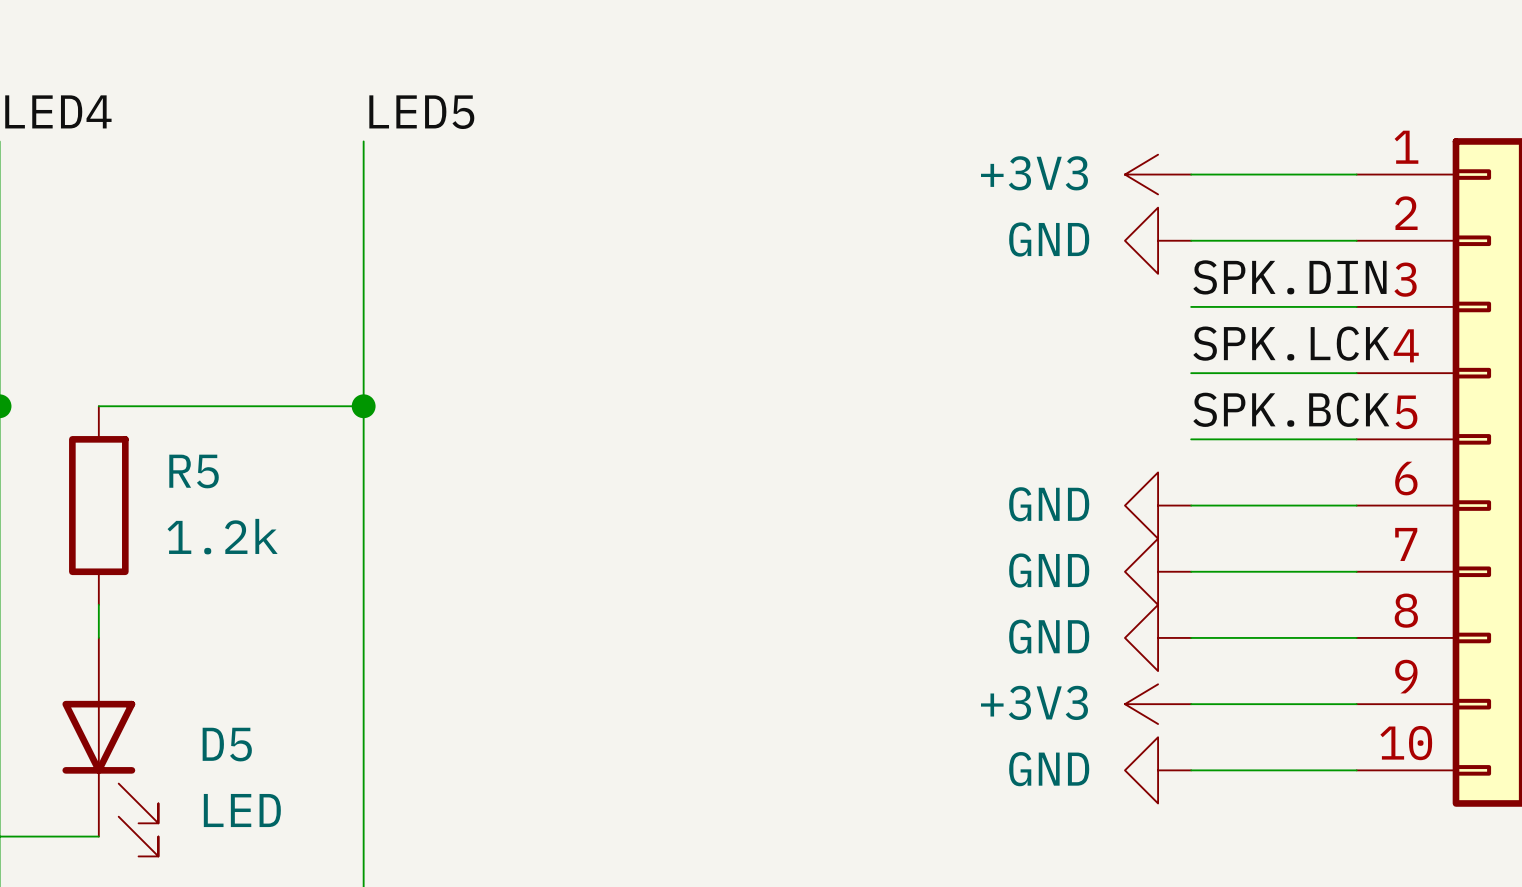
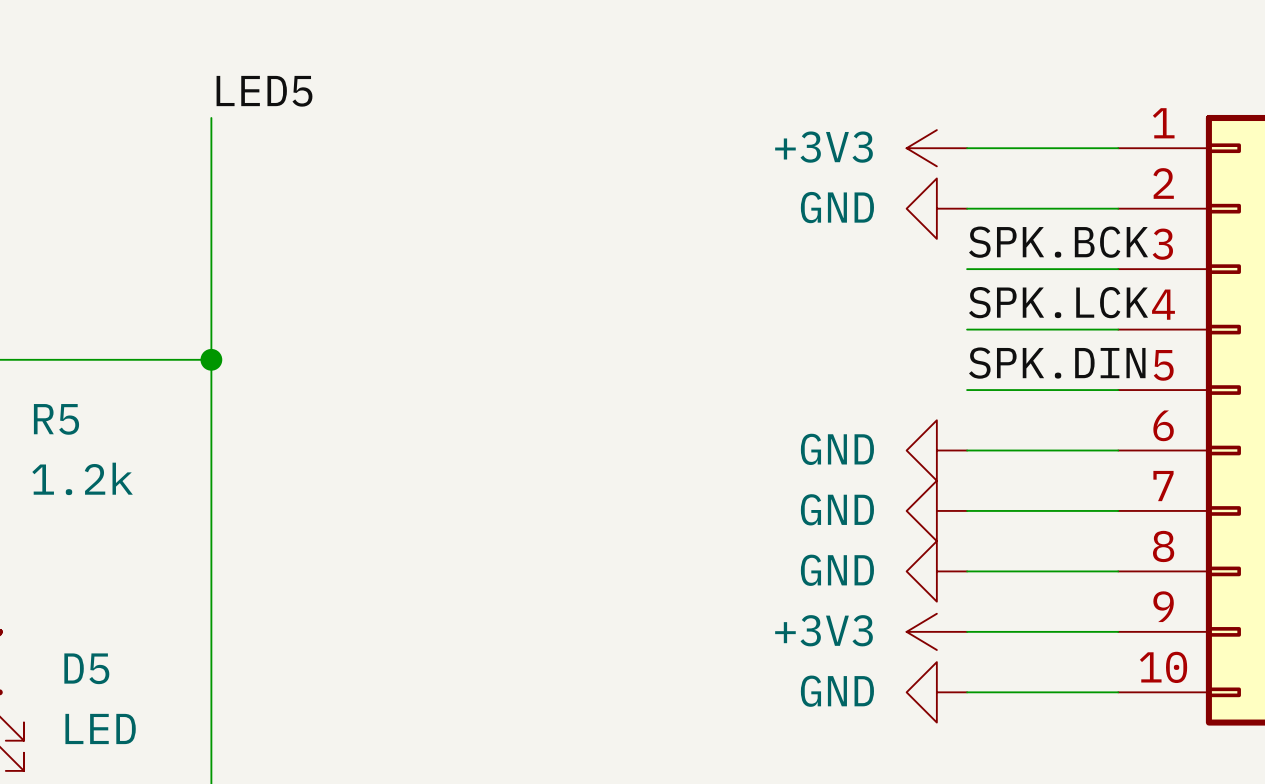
label: SPK.DIN (1289, 277) -> SPK.BCK (1058, 242)
label: SPK.BCK (1291, 409) -> SPK.DIN (1057, 363)

